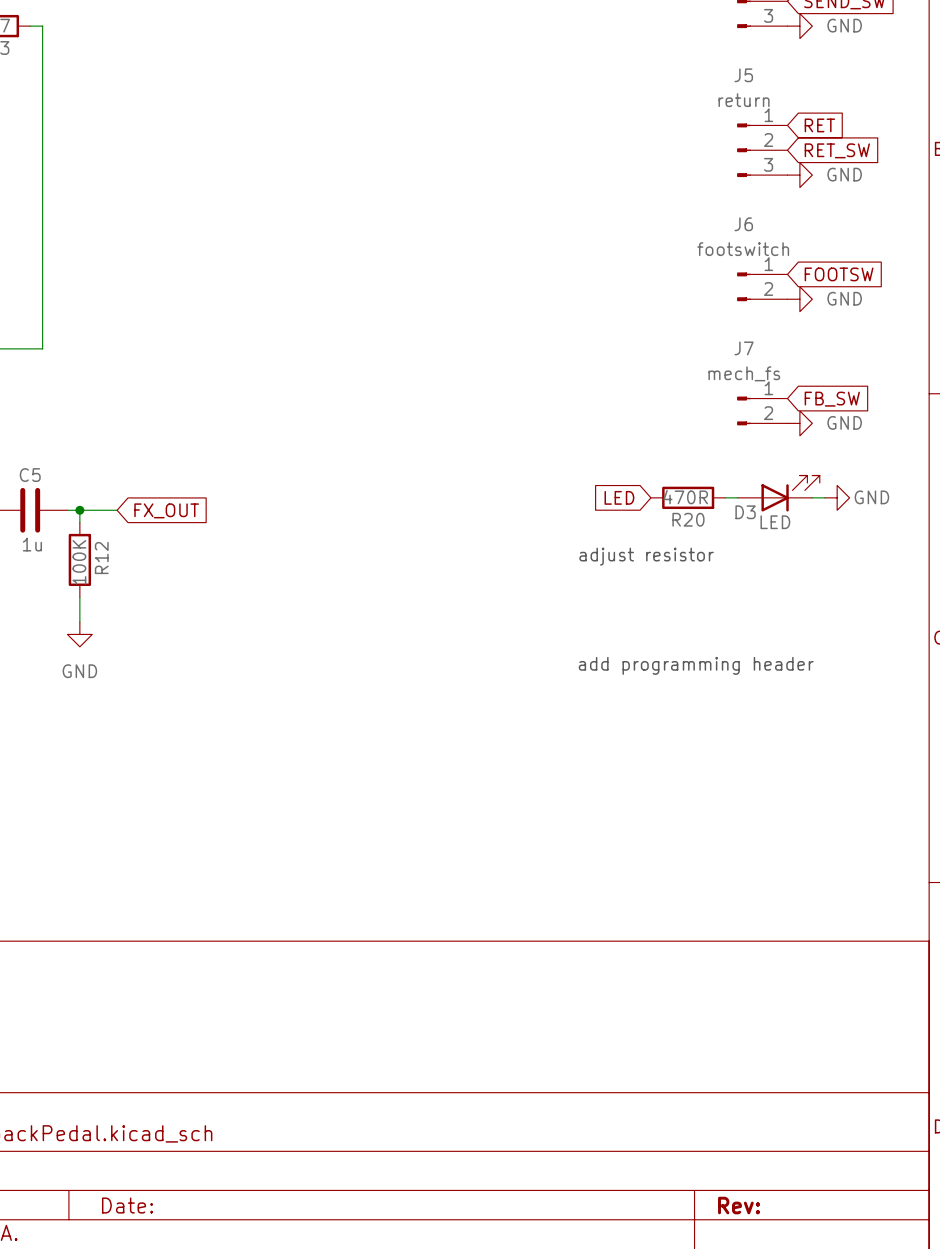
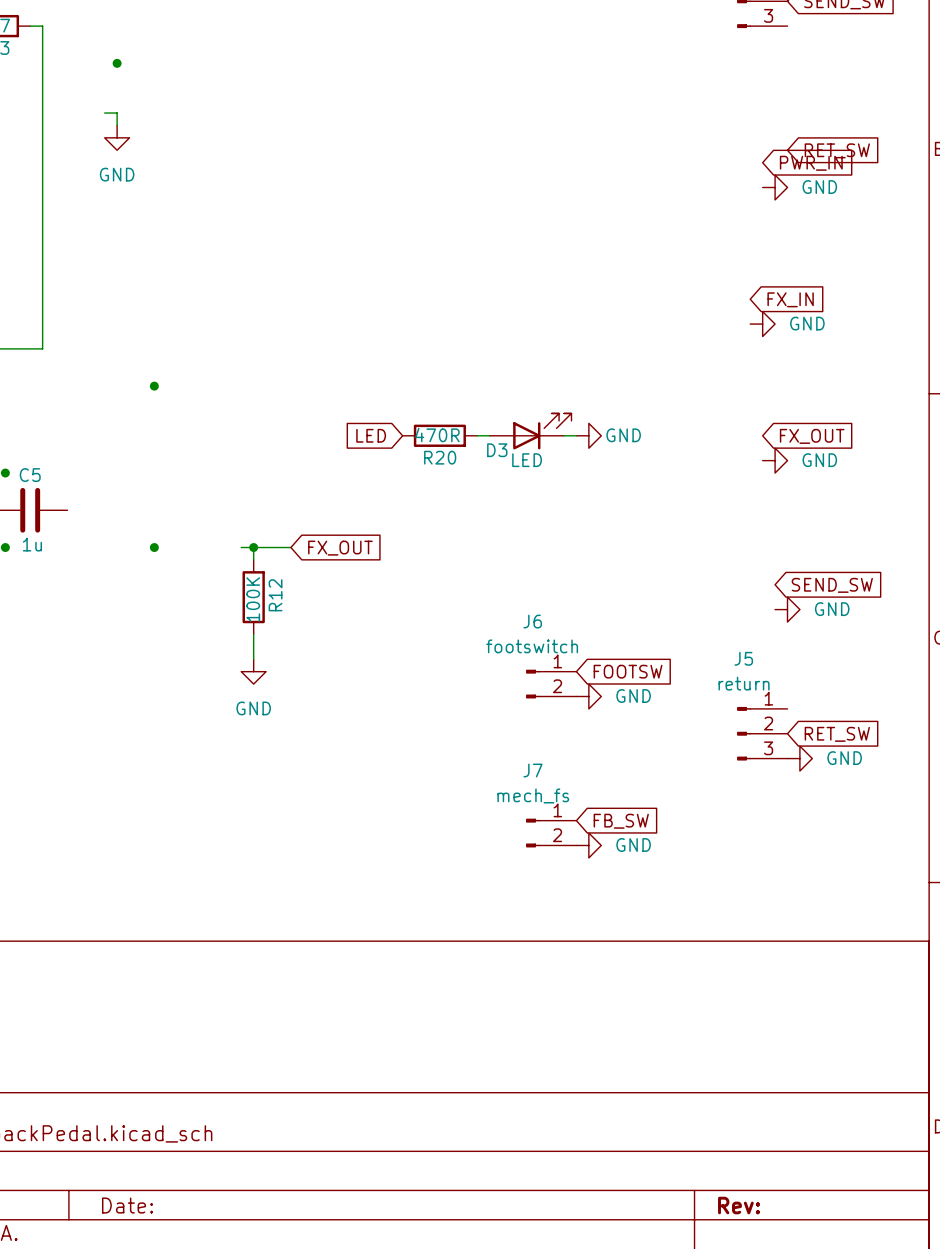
power symbol: GND (799, 26) -> none
junction: none -> (117, 63)
wire: none -> (104, 113) (117, 113) (117, 125)
global label: RET (819, 125) -> none
power symbol: none -> GND (117, 137)
J5 position: (762, 150) -> (762, 733)
global label: none -> PWR_IN (811, 163)
power symbol position: GND (799, 175) -> GND (775, 187)
global label: FOOTSW (839, 274) -> none
J6 position: (762, 286) -> (551, 684)
global label: none -> FX_IN (790, 299)
power symbol position: GND (799, 299) -> GND (762, 324)
junction: none -> (154, 386)
global label: FB_SW (832, 399) -> none
J7 position: (762, 410) -> (551, 833)
power symbol: GND (799, 423) -> none
global label: none -> LED (371, 435)
wire: none -> (477, 435) (489, 435)
power symbol: none -> GND (588, 435)
global label: none -> FX_OUT (812, 436)
power symbol: none -> GND (775, 460)
junction: none -> (5, 473)
D3 position: (778, 493) -> (530, 431)
global label: LED (619, 497) -> none
R20 position: (688, 497) -> (439, 435)
wire: (725, 497) (737, 497) -> (564, 435) (576, 435)
wire: (812, 497) (824, 497) -> none
power symbol: GND (837, 497) -> none
wire: (67, 510) (117, 510) -> (241, 547) (290, 547)
wire: (79, 510) (79, 522) -> (253, 547) (253, 559)
junction: (79, 510) -> none
global label position: FX_OUT (166, 510) -> FX_OUT (340, 548)
junction: none -> (5, 547)
junction: none -> (154, 547)
junction: none -> (253, 547)
text: adjust resistor (646, 556) -> none
R12 position: (79, 559) -> (253, 597)
global label: none -> SEND_SW (832, 585)
wire: (79, 597) (79, 622) -> (253, 634) (253, 659)
power symbol: none -> GND (787, 609)
power symbol: GND (79, 634) -> none
text: add programming header (696, 665) -> none
power symbol: none -> GND (253, 671)
global label: none -> FOOTSW (628, 671)
power symbol: none -> GND (588, 696)
global label: none -> RET_SW (837, 734)
power symbol: none -> GND (799, 758)
global label: none -> FB_SW (621, 821)
power symbol: none -> GND (588, 845)

